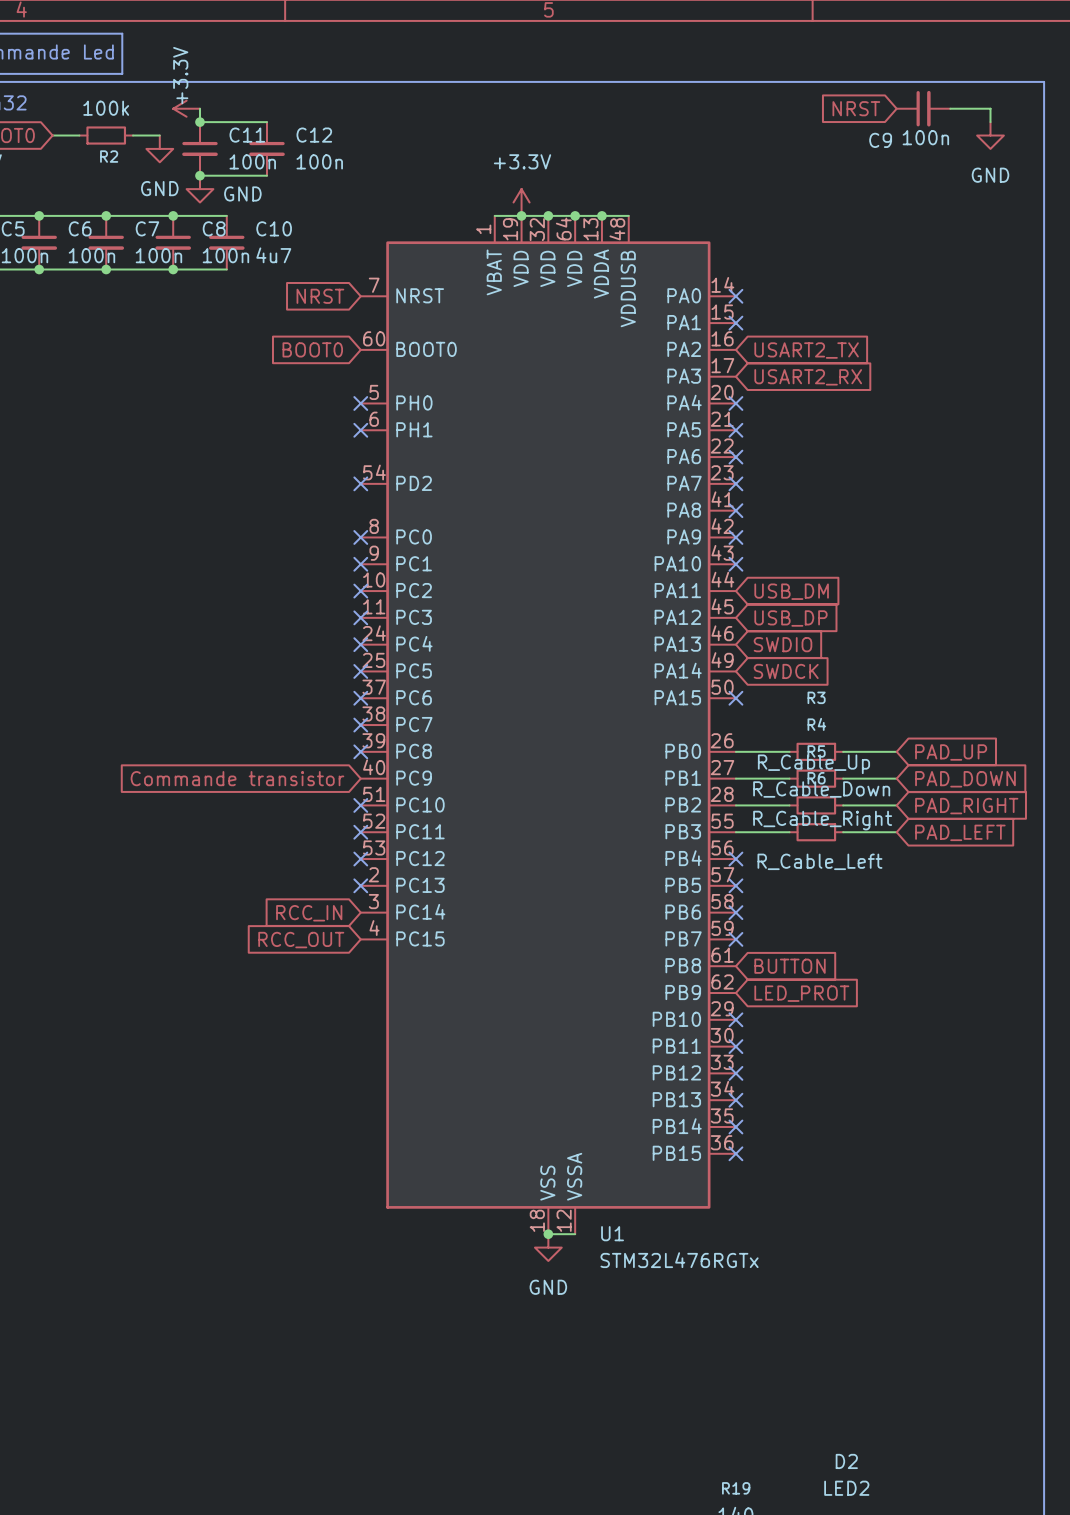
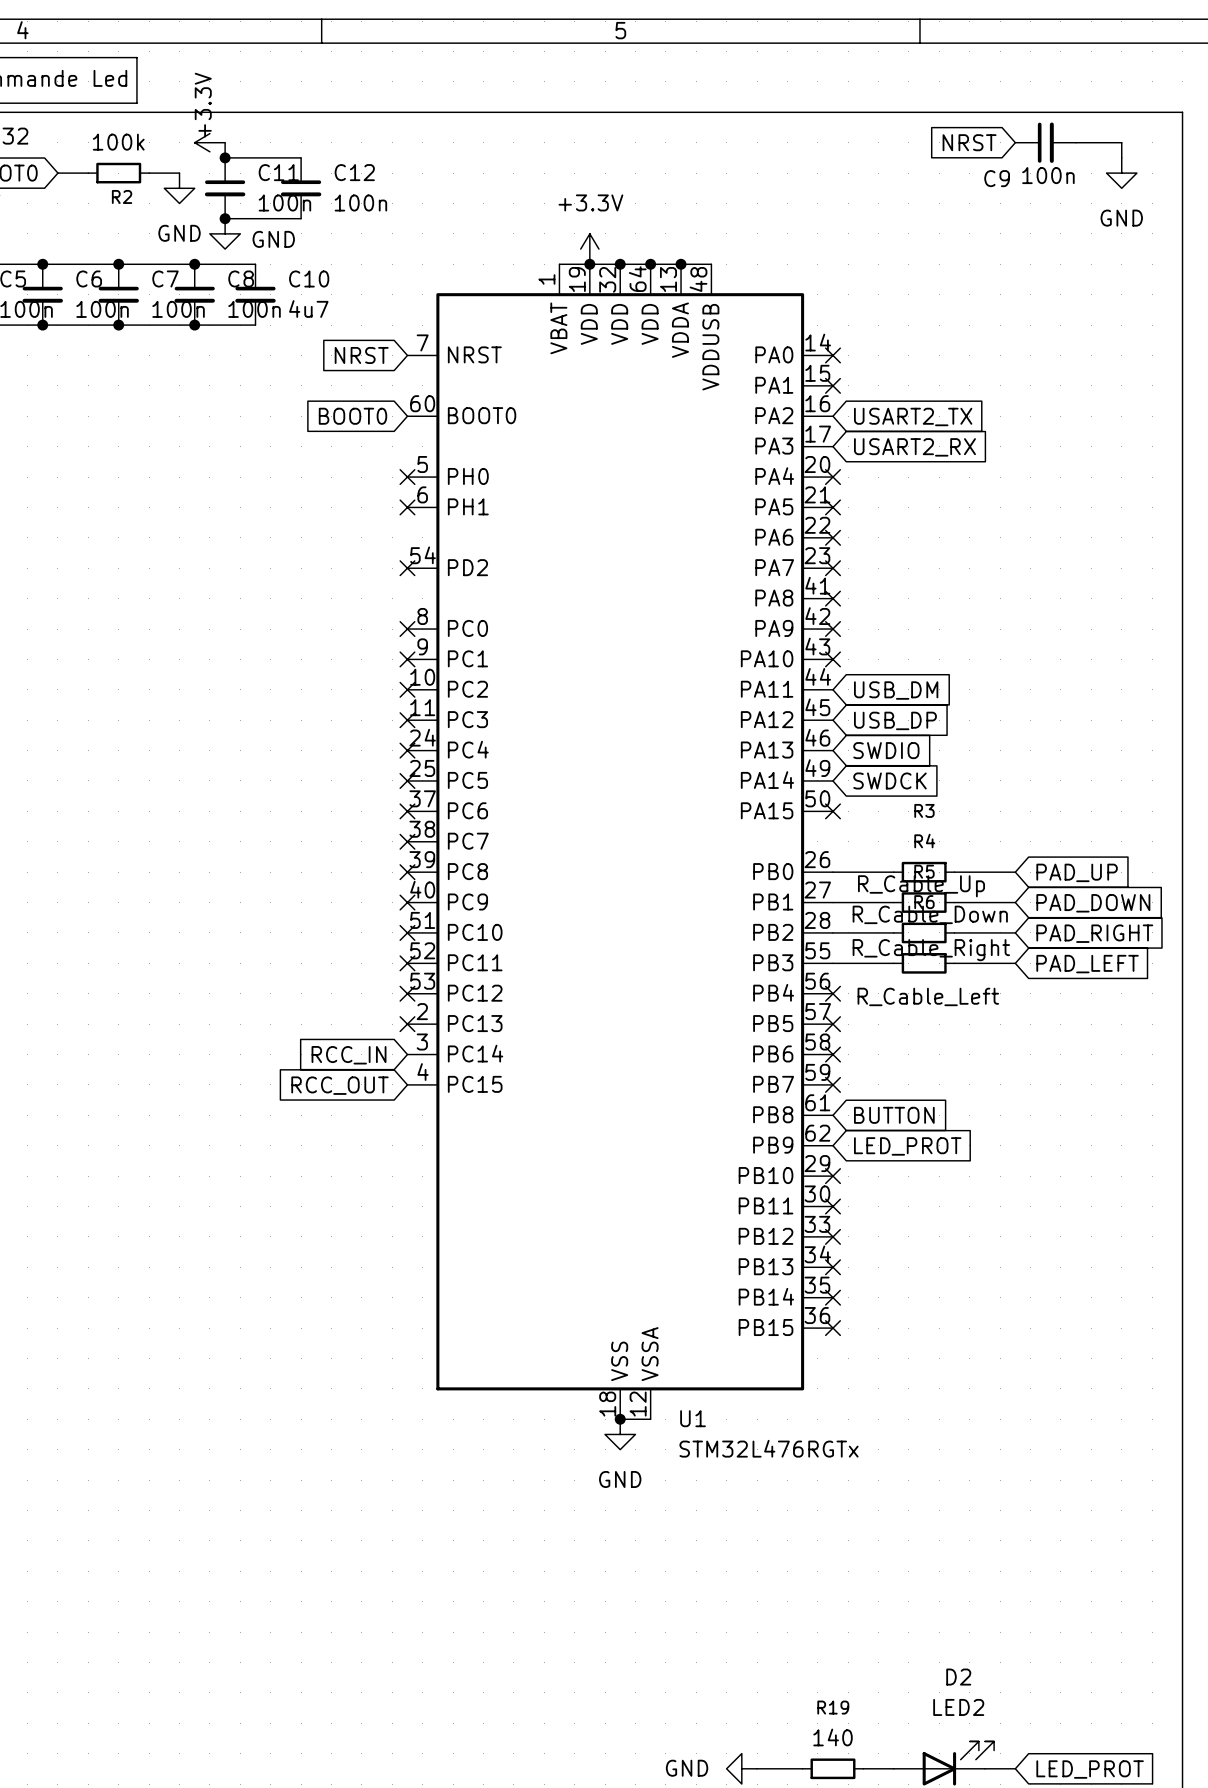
global label: Commande transistor (237, 778) -> none
no-connect mark: none -> (407, 902)

